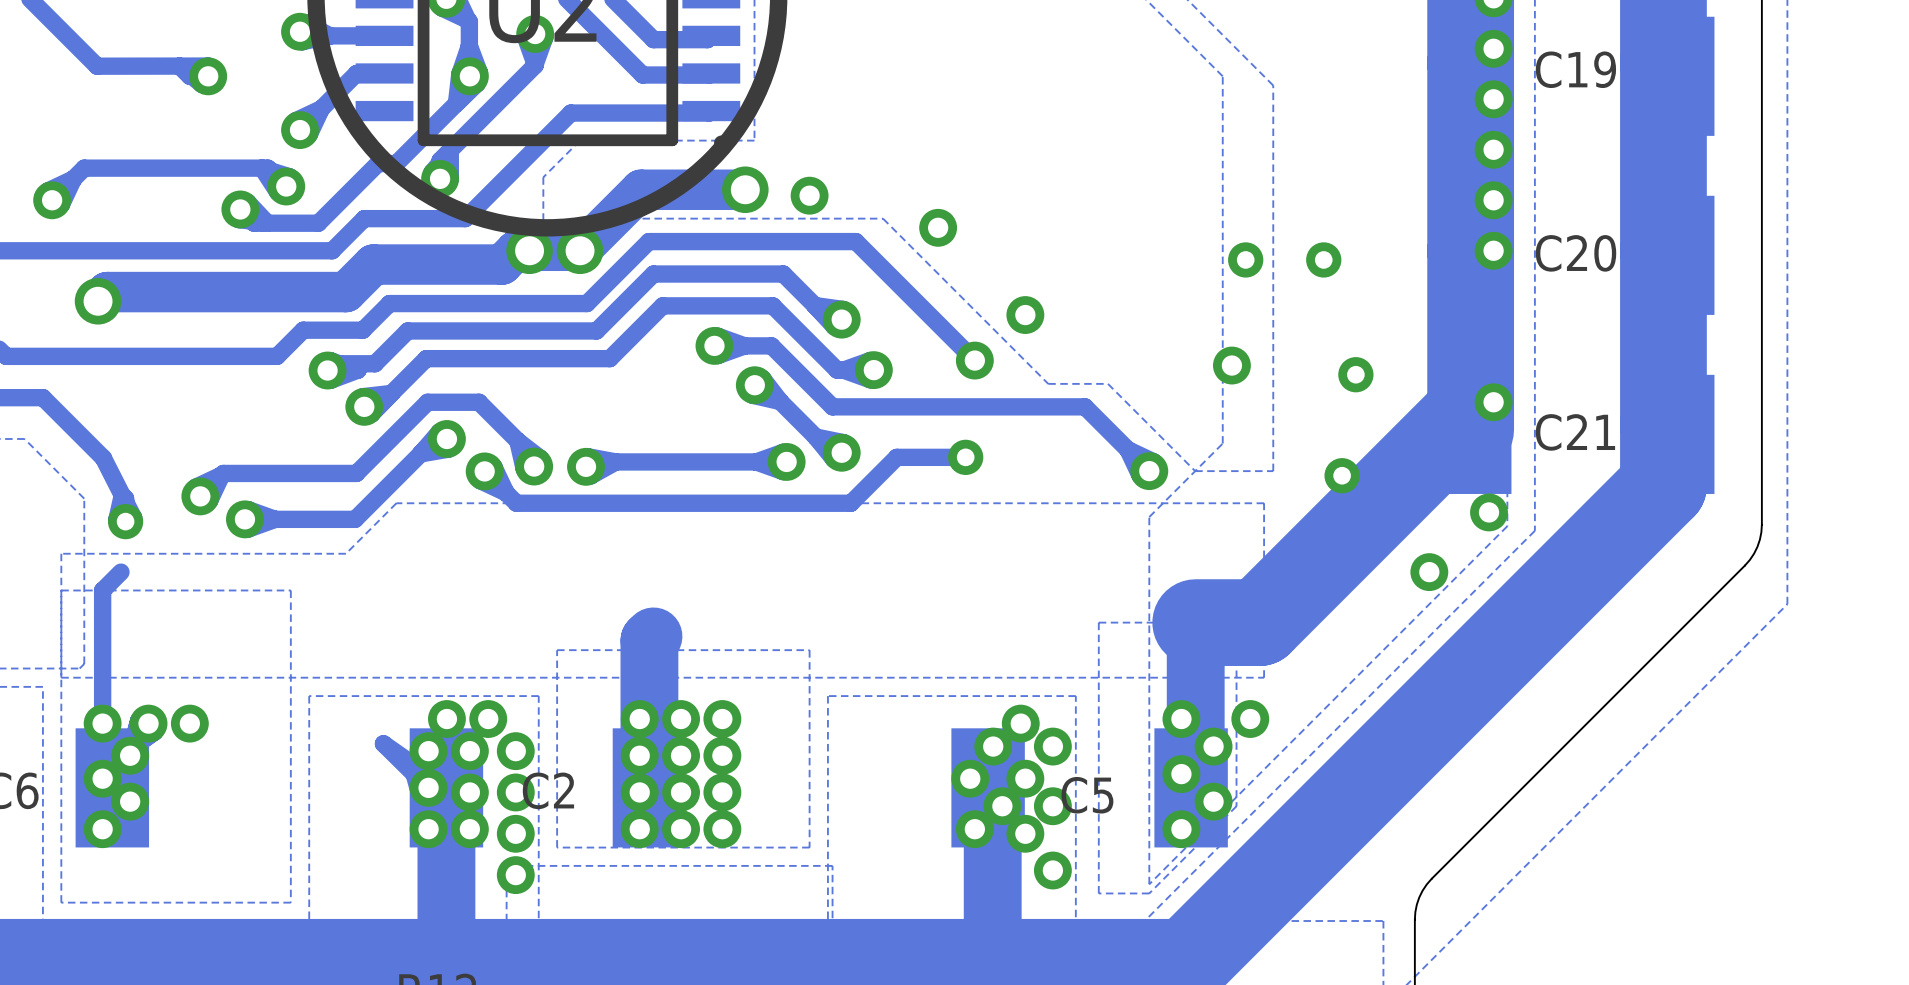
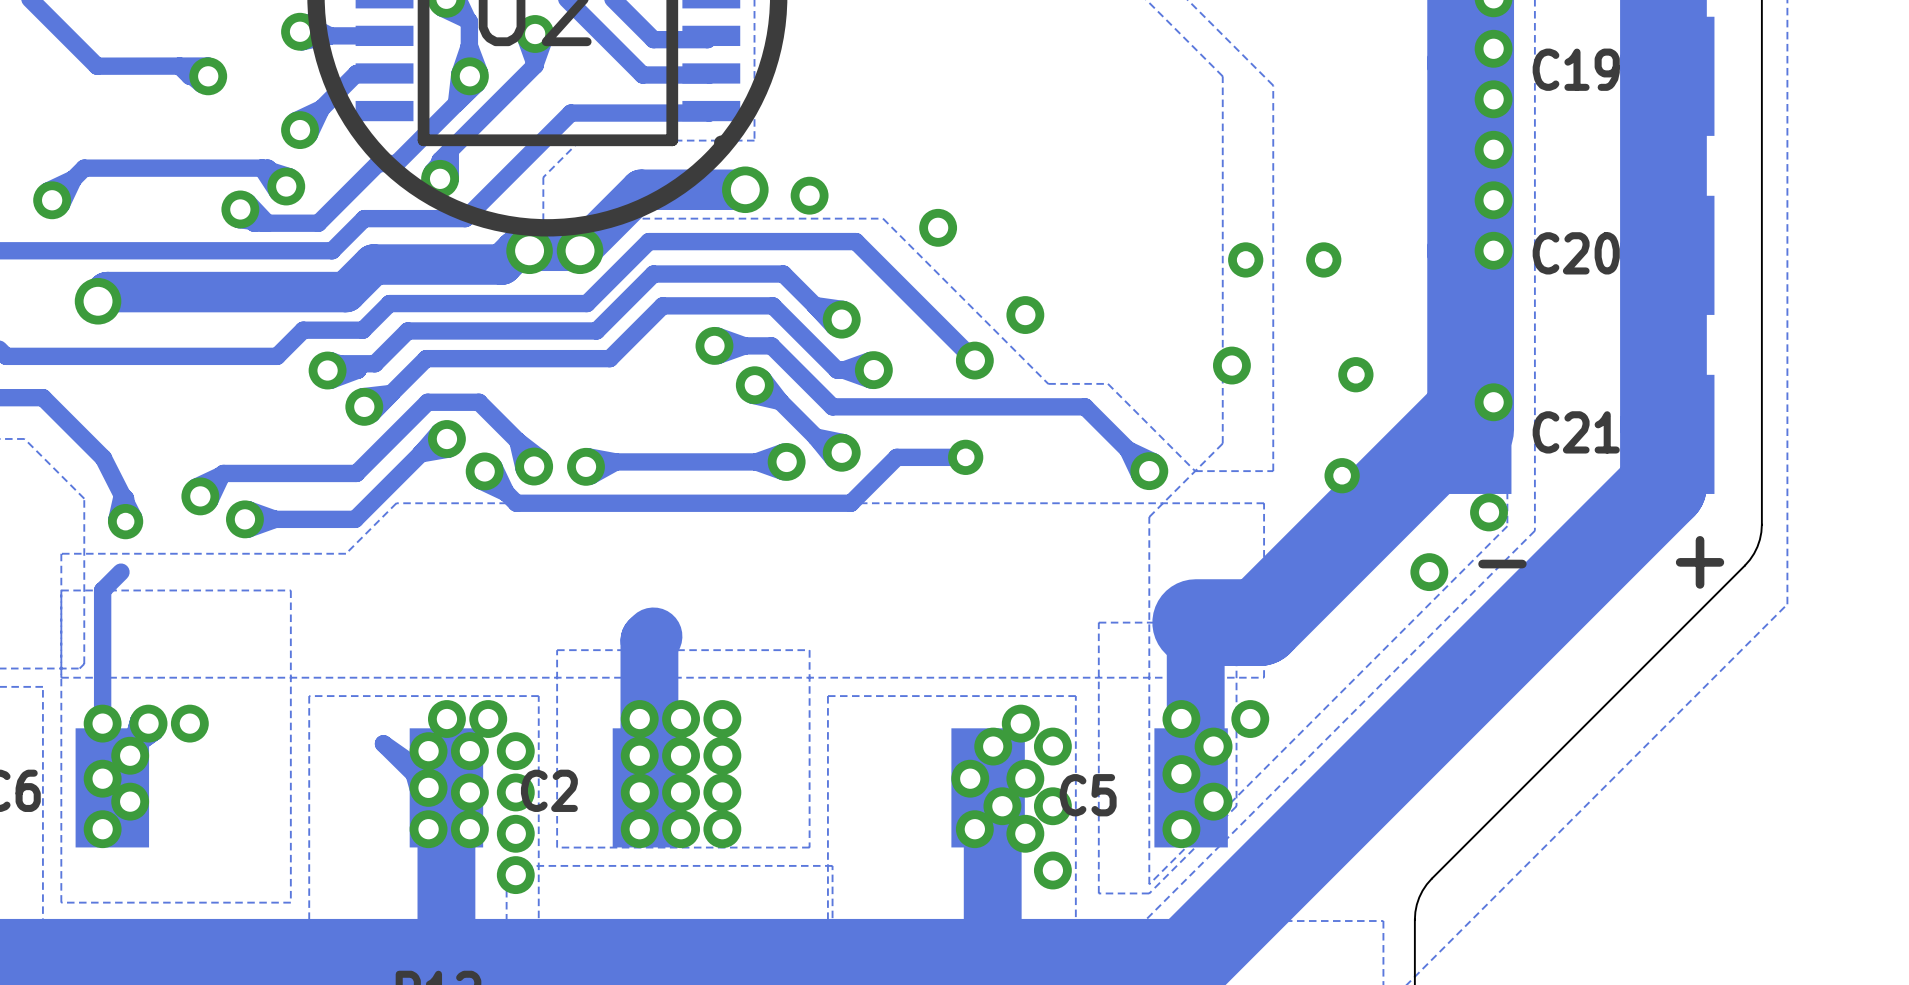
text: none -> + (1700, 562)
text: none -> - (1502, 564)

